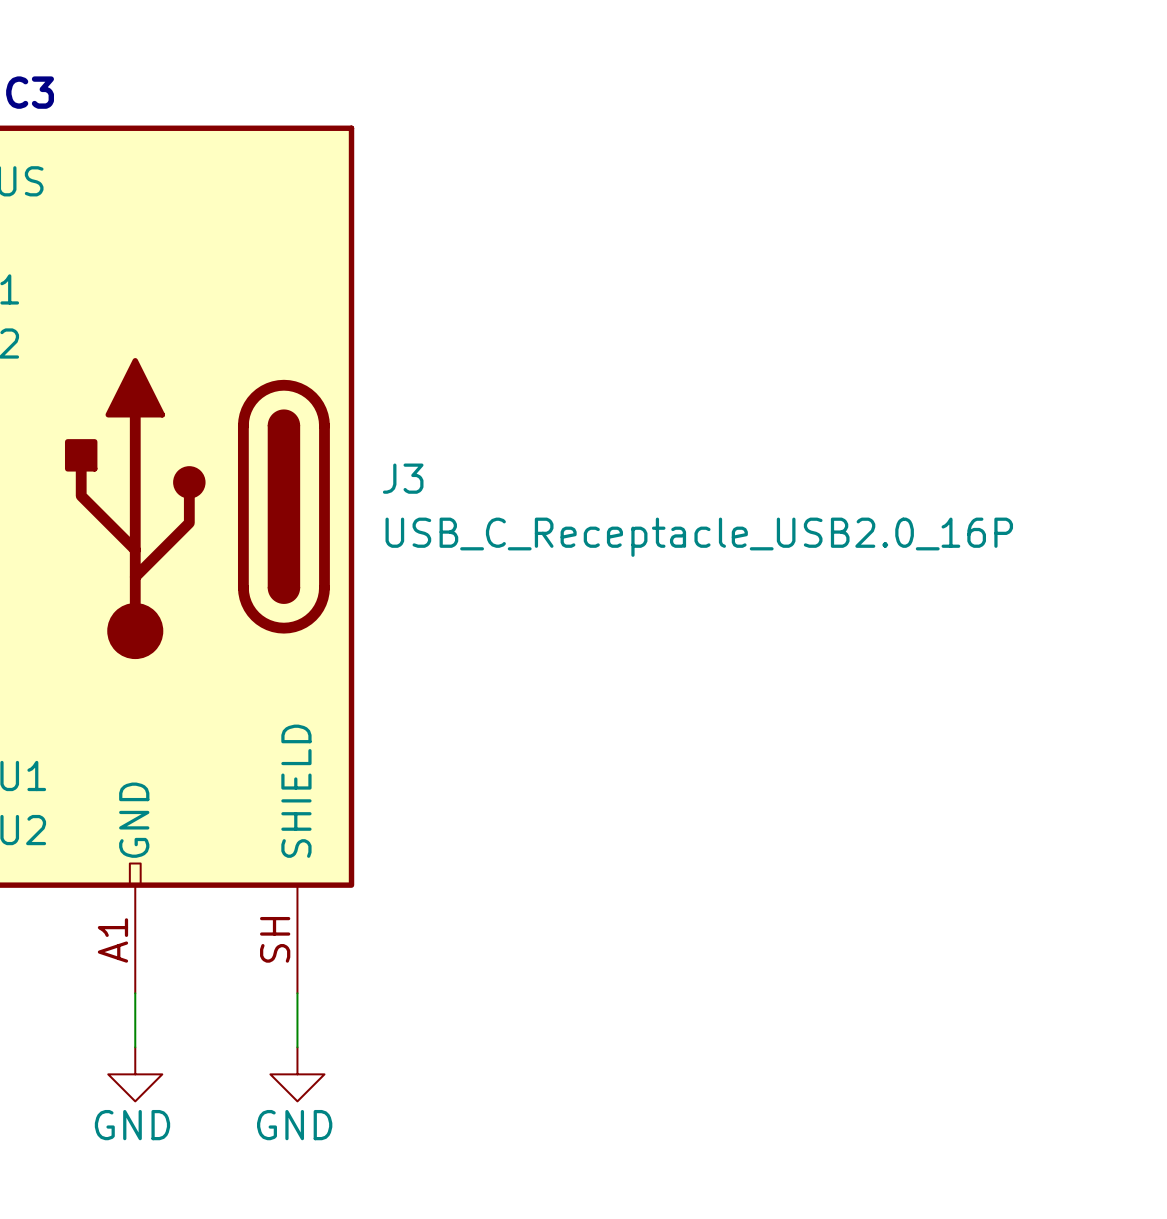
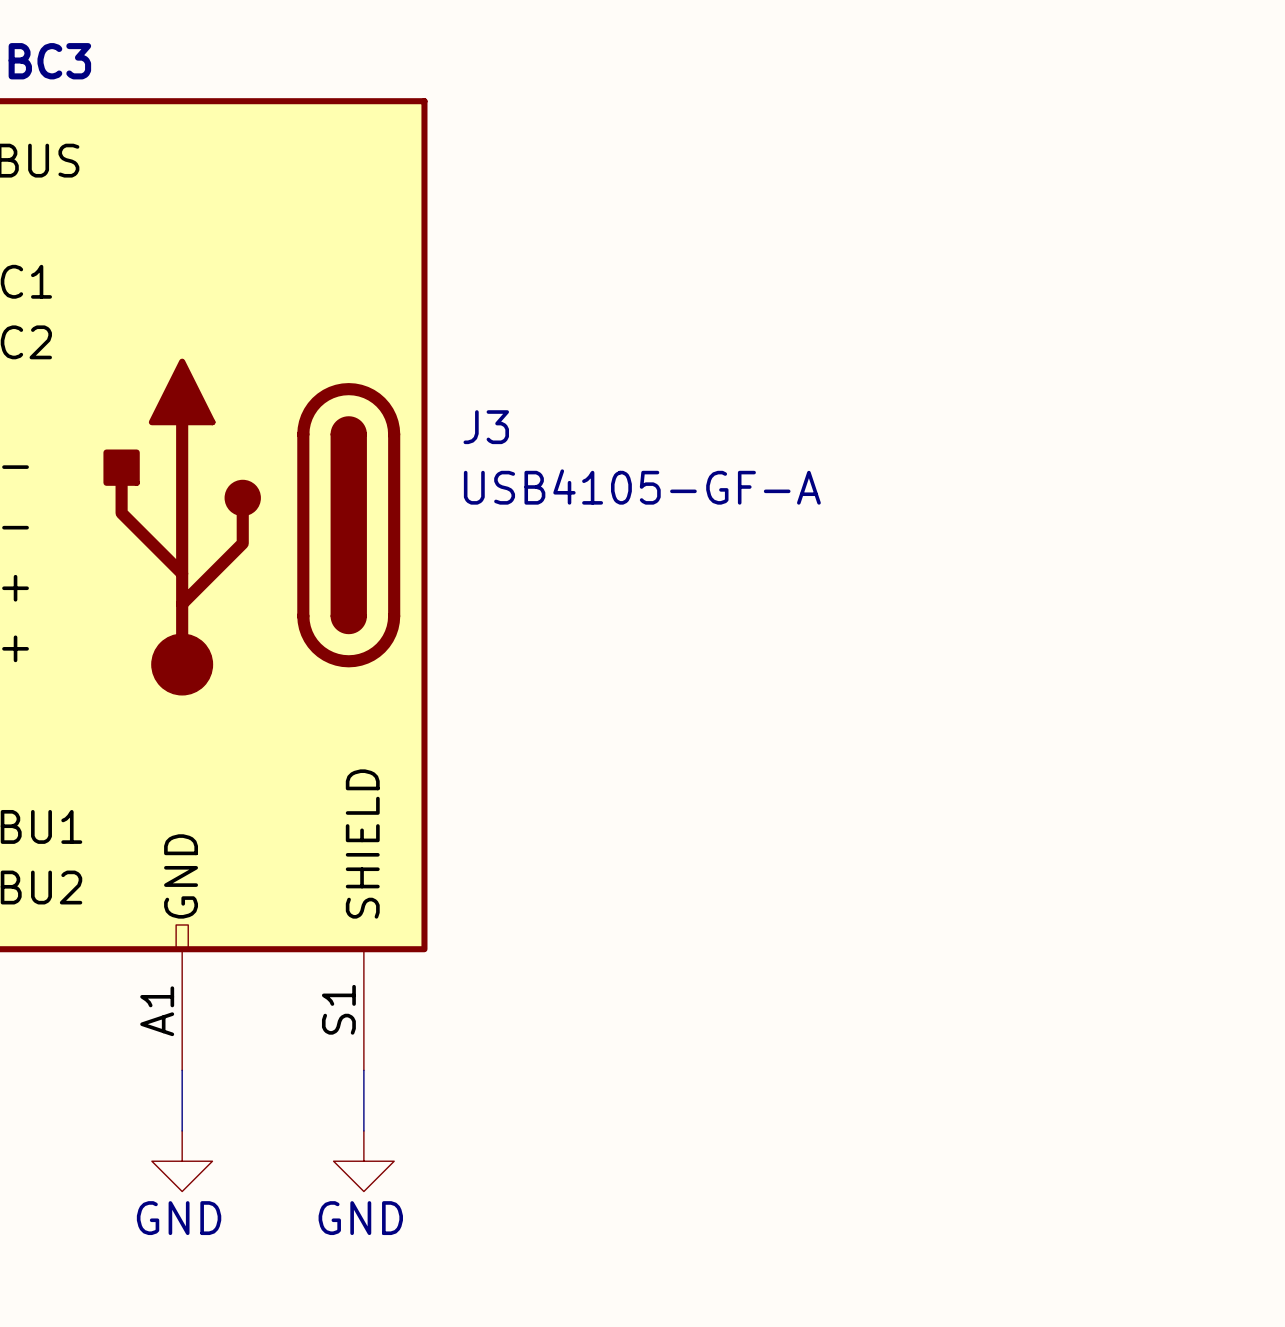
J3 name position: J3 (403, 478) -> J3 (486, 427)
J3 value: USB_C_Receptacle_USB2.0_16P (699, 537) -> USB4105-GF-A (642, 487)
J3 pin number: SH (275, 939) -> S1 (338, 1009)

